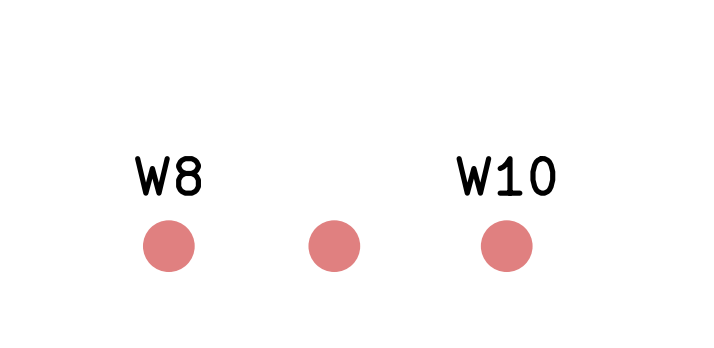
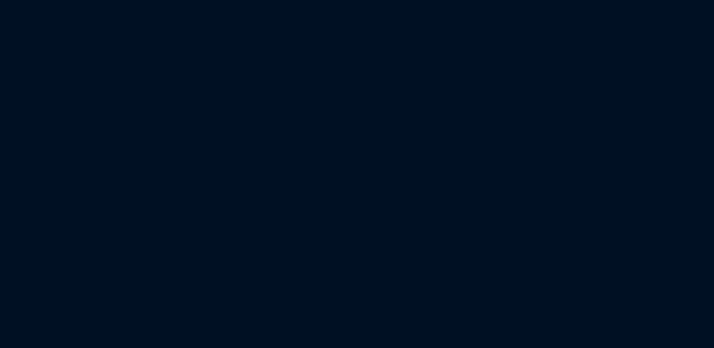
W8: (168, 246) -> none
part: (334, 246) -> none
W10: (506, 246) -> none

